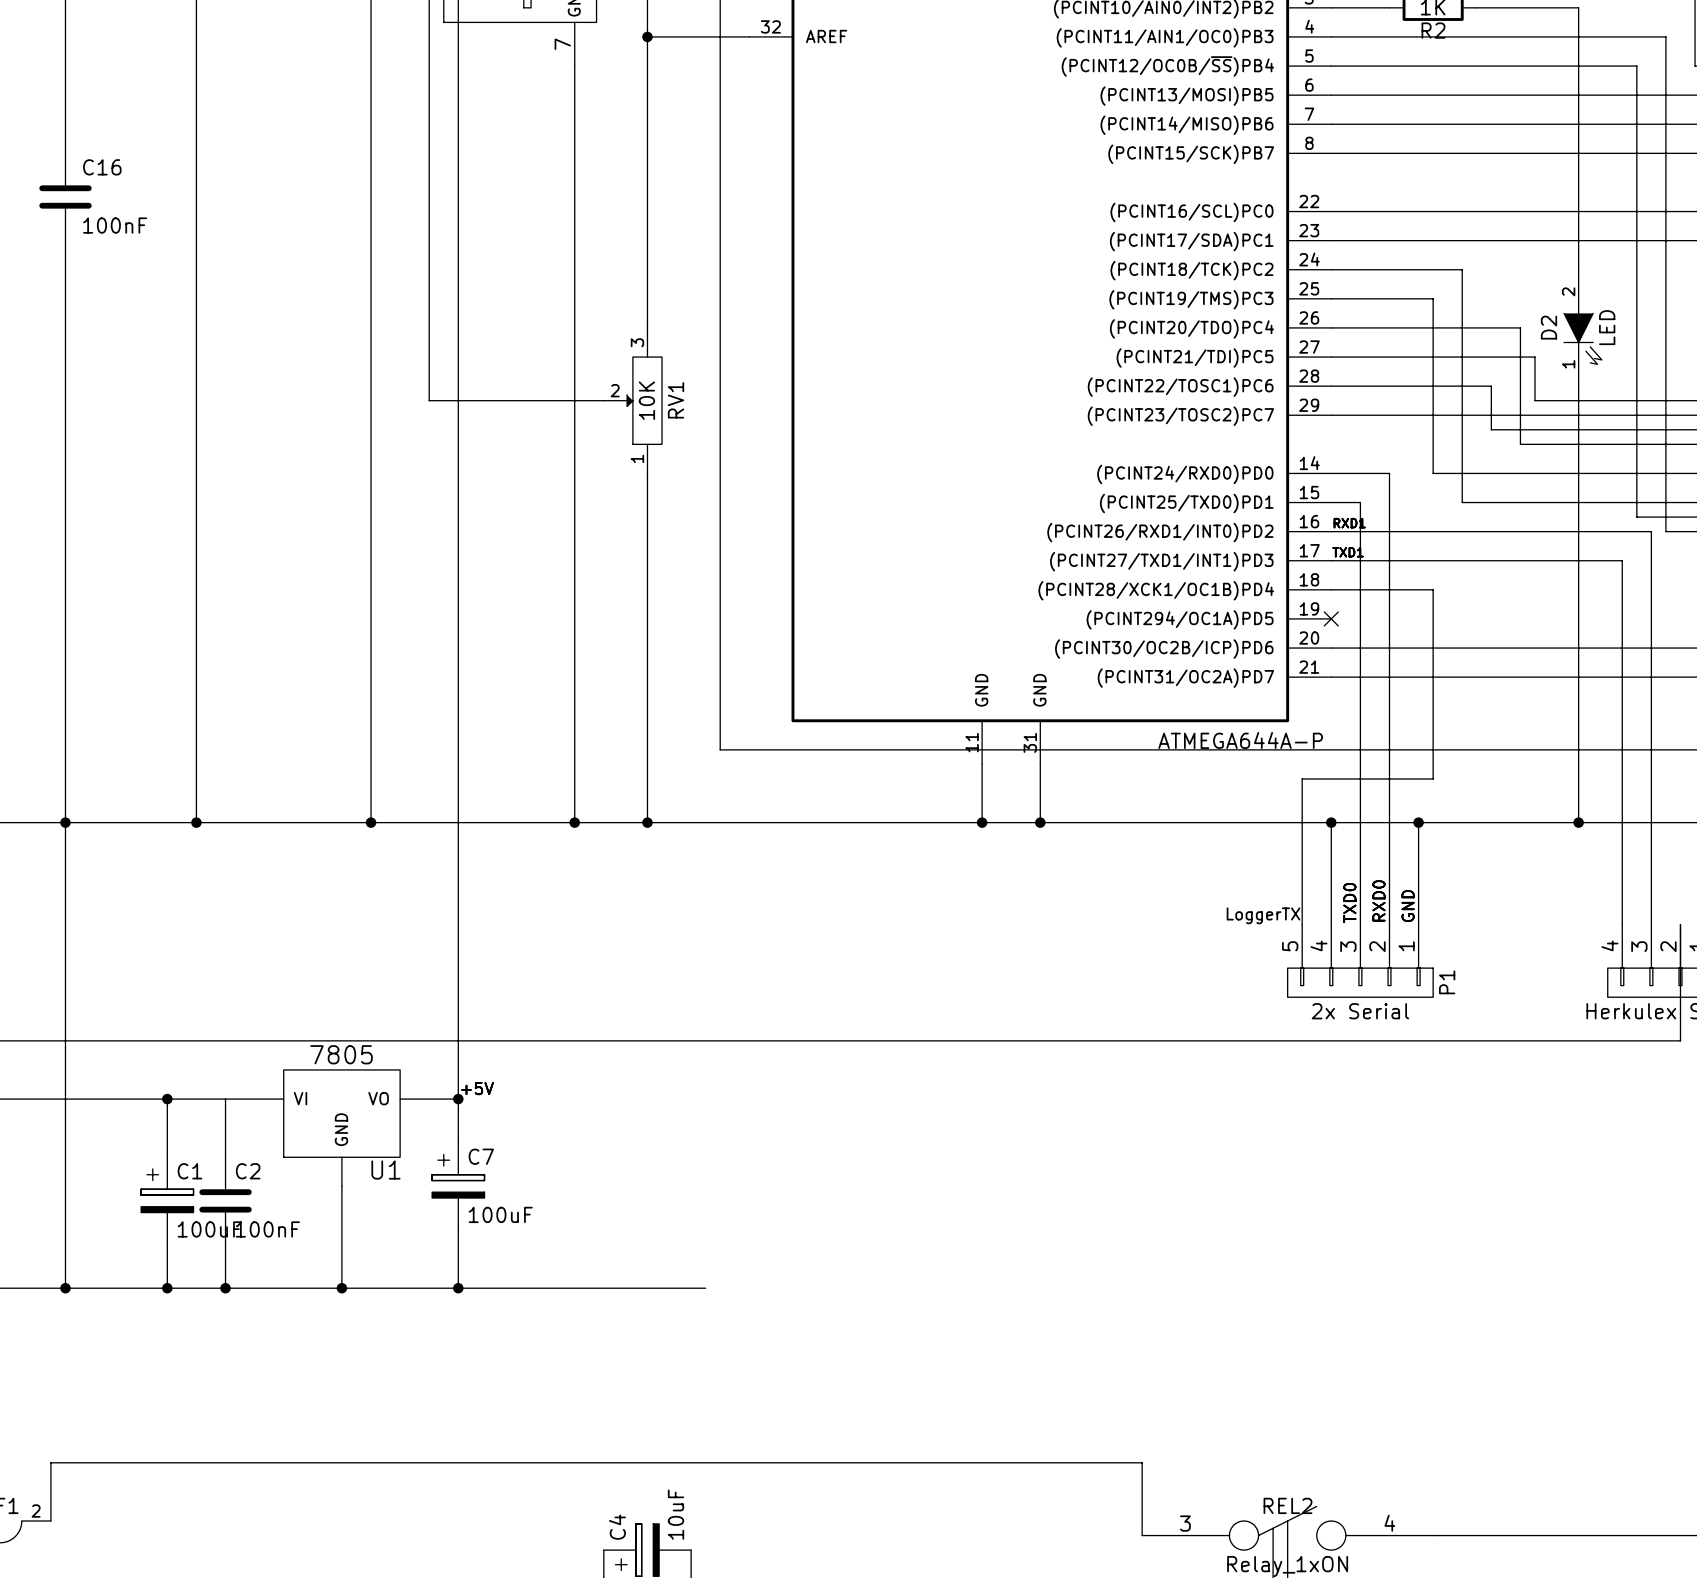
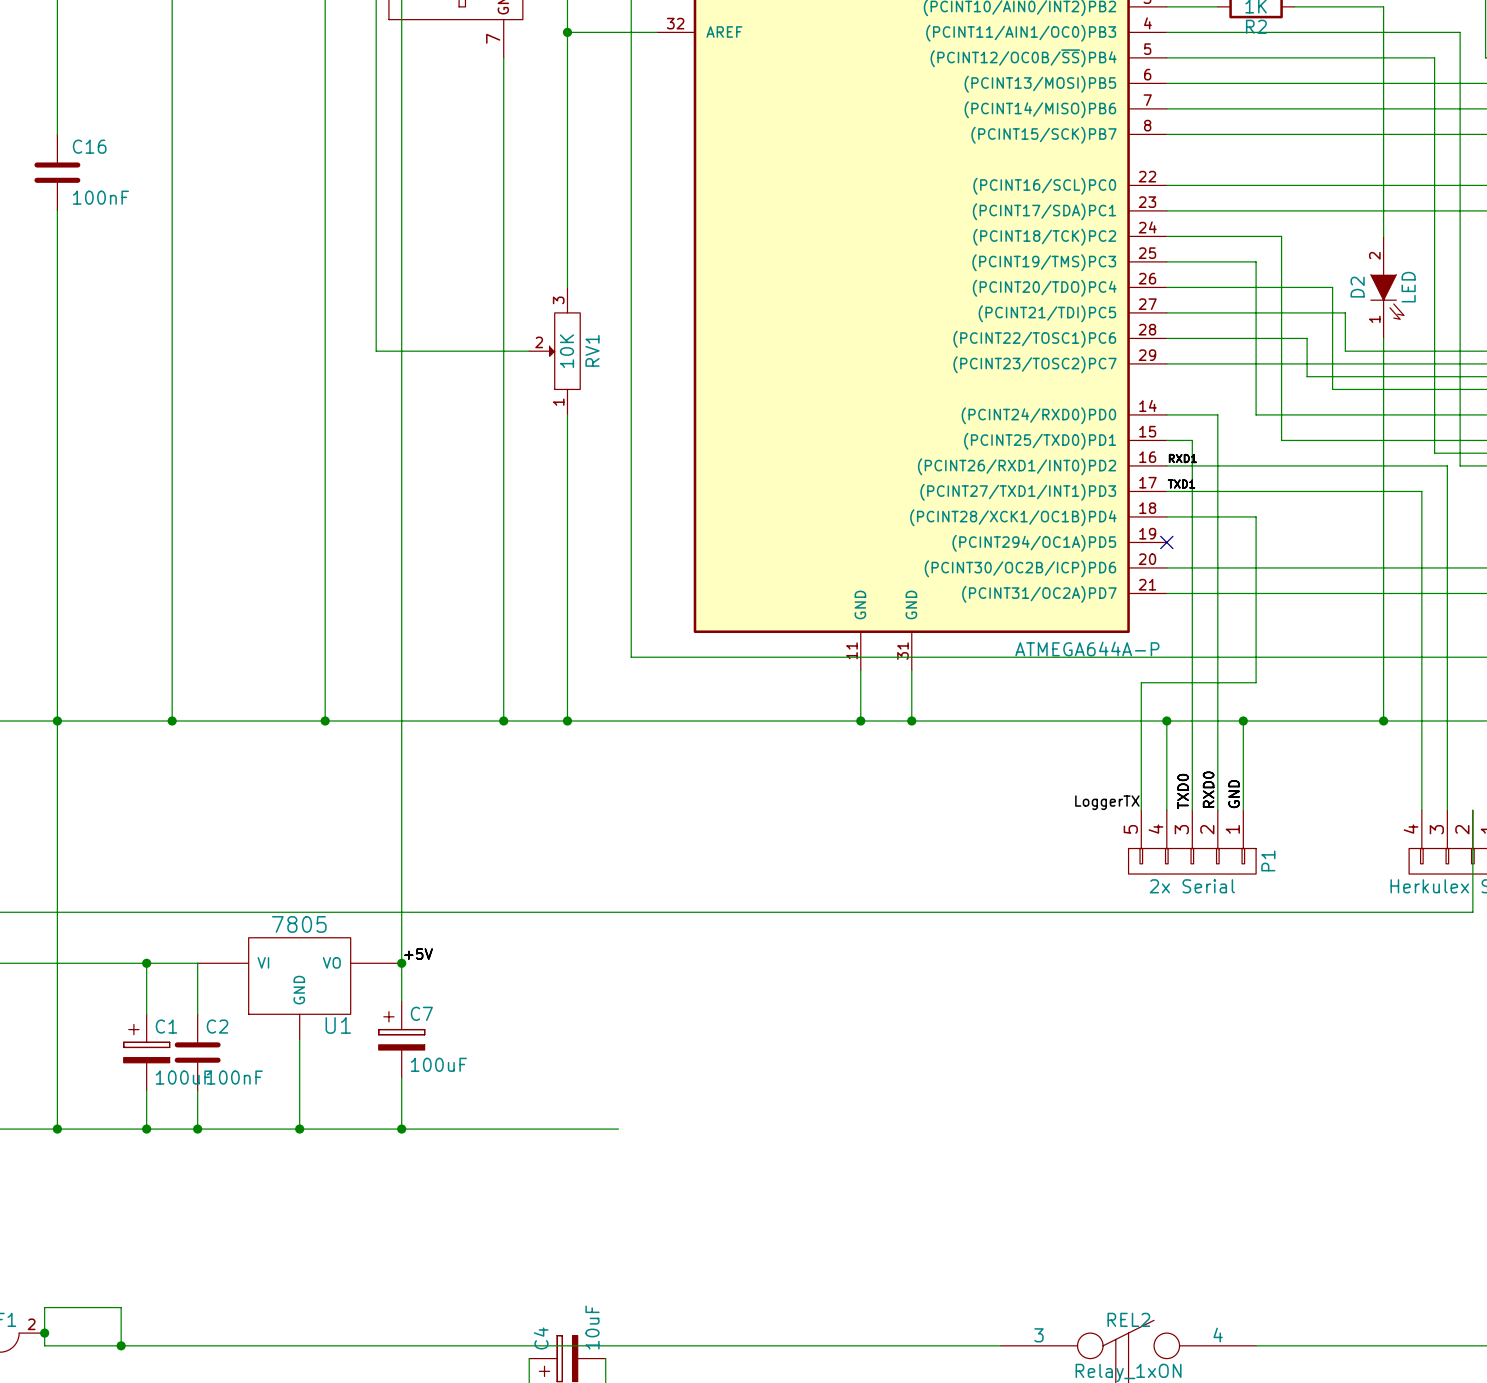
wire: (50, 1491) (50, 1462) (1142, 1462) (1142, 1535) -> (44, 1333) (44, 1345) (1001, 1345)
wire: none -> (44, 1307) (121, 1307) (121, 1345)
junction: none -> (44, 1333)
junction: none -> (121, 1345)

